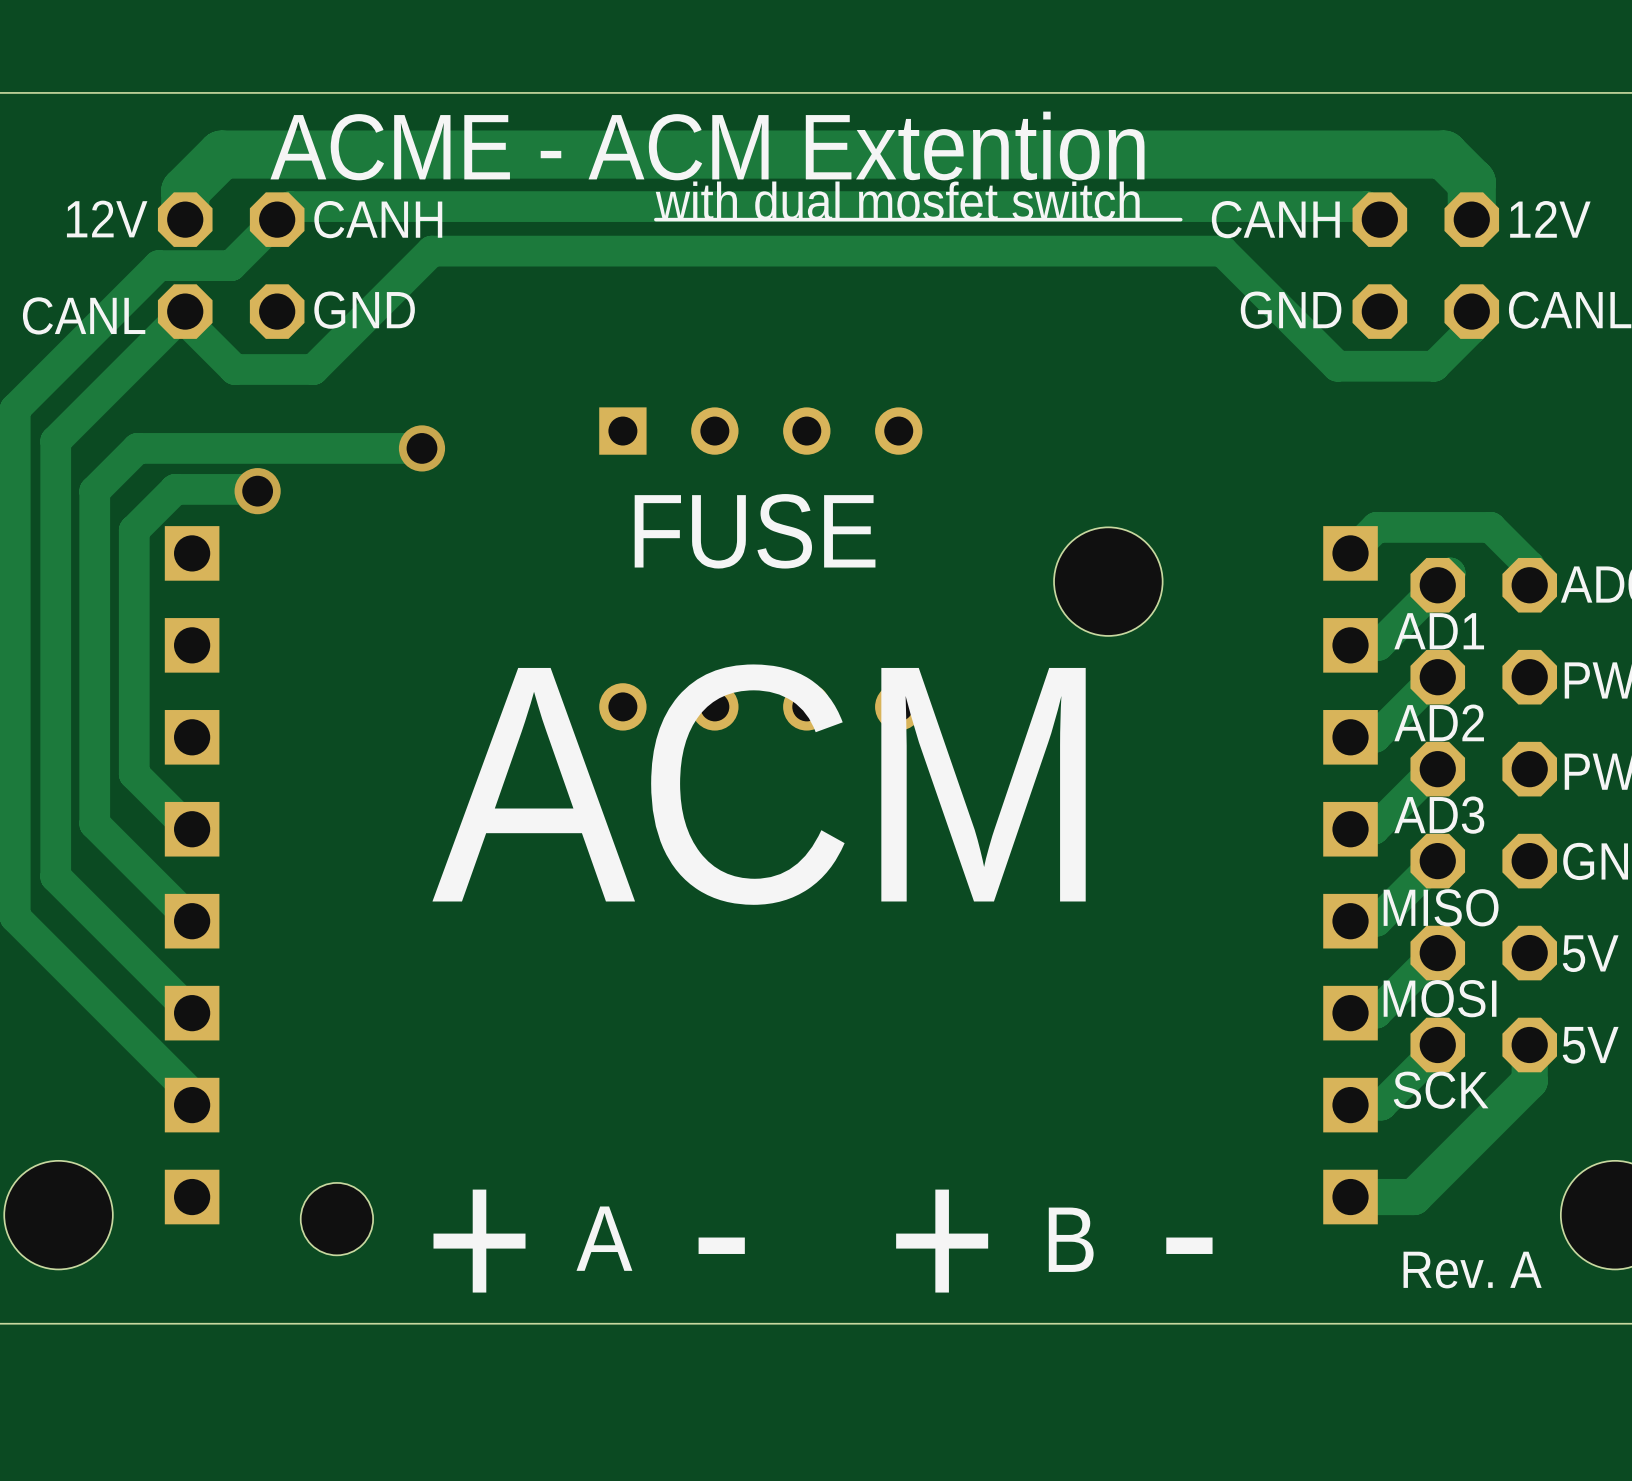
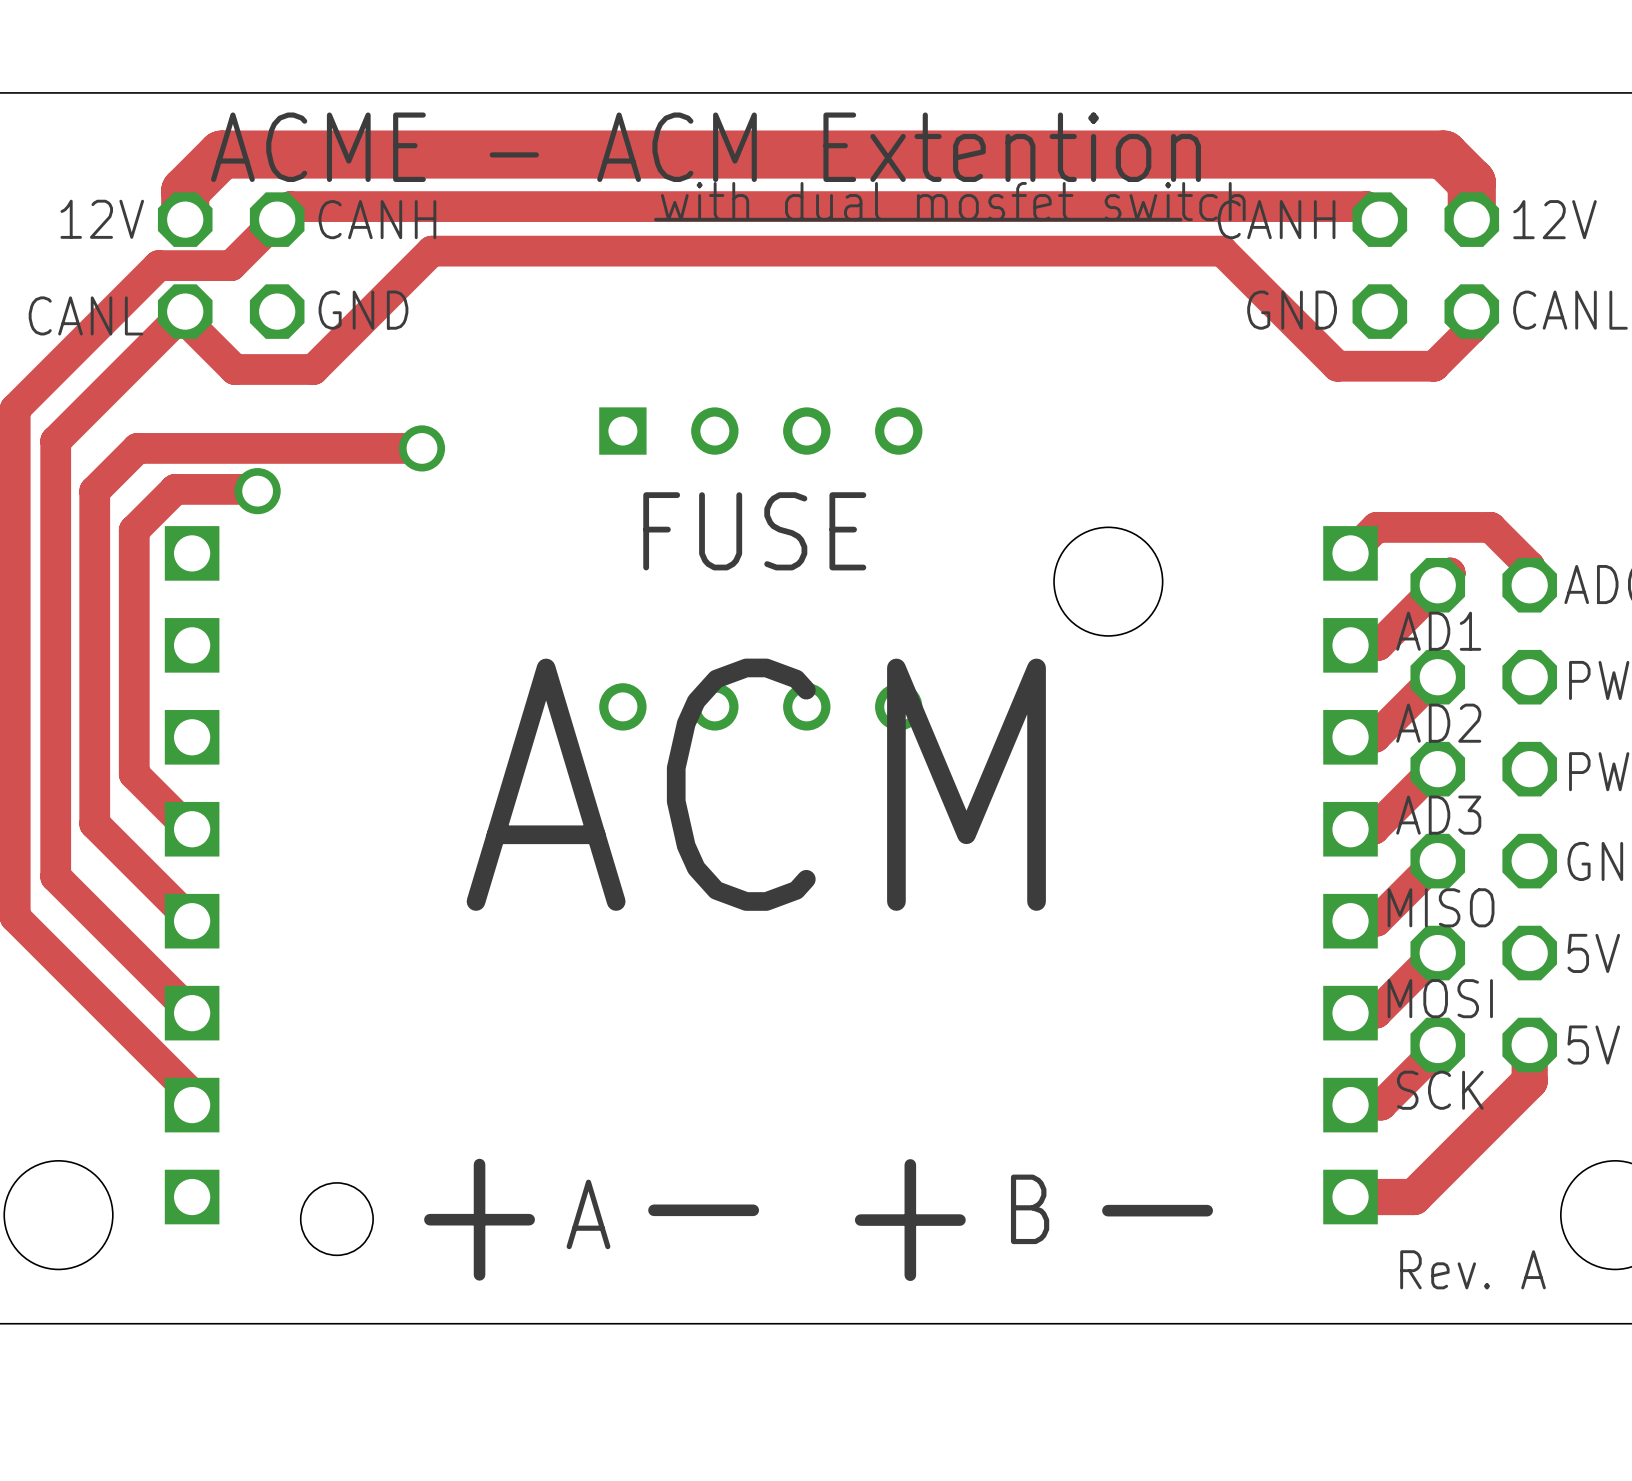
text position: A (604, 1238) -> A (588, 1214)
text position: B (1071, 1239) -> B (1030, 1209)
text position: + (479, 1241) -> + (479, 1219)
text position: + (942, 1241) -> + (910, 1220)
text position: - (721, 1245) -> - (703, 1210)
text position: - (1189, 1245) -> - (1157, 1210)

